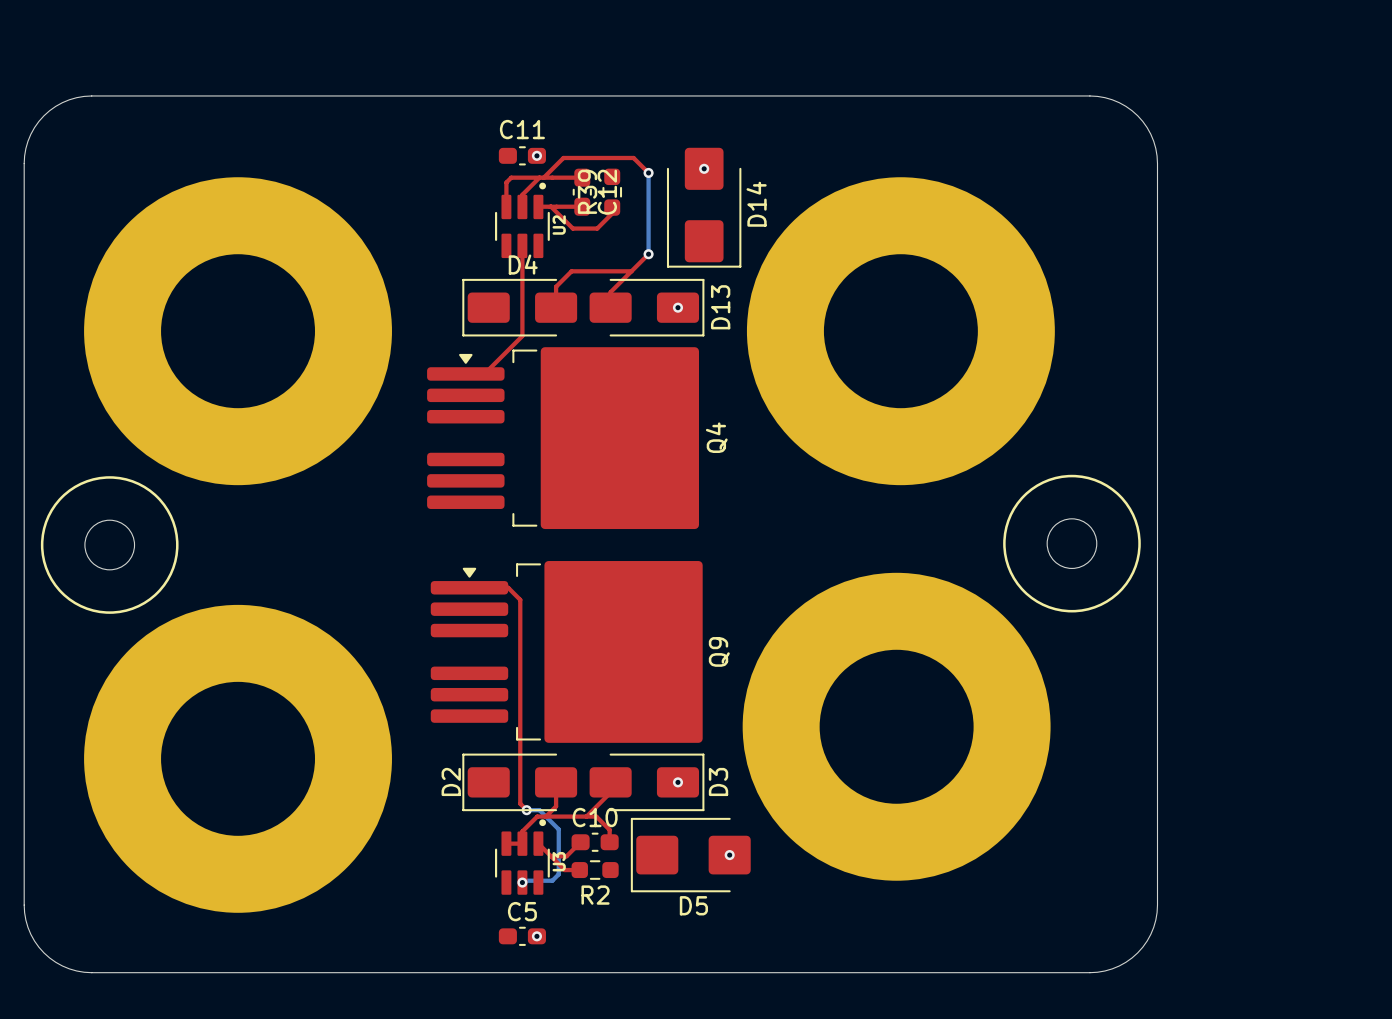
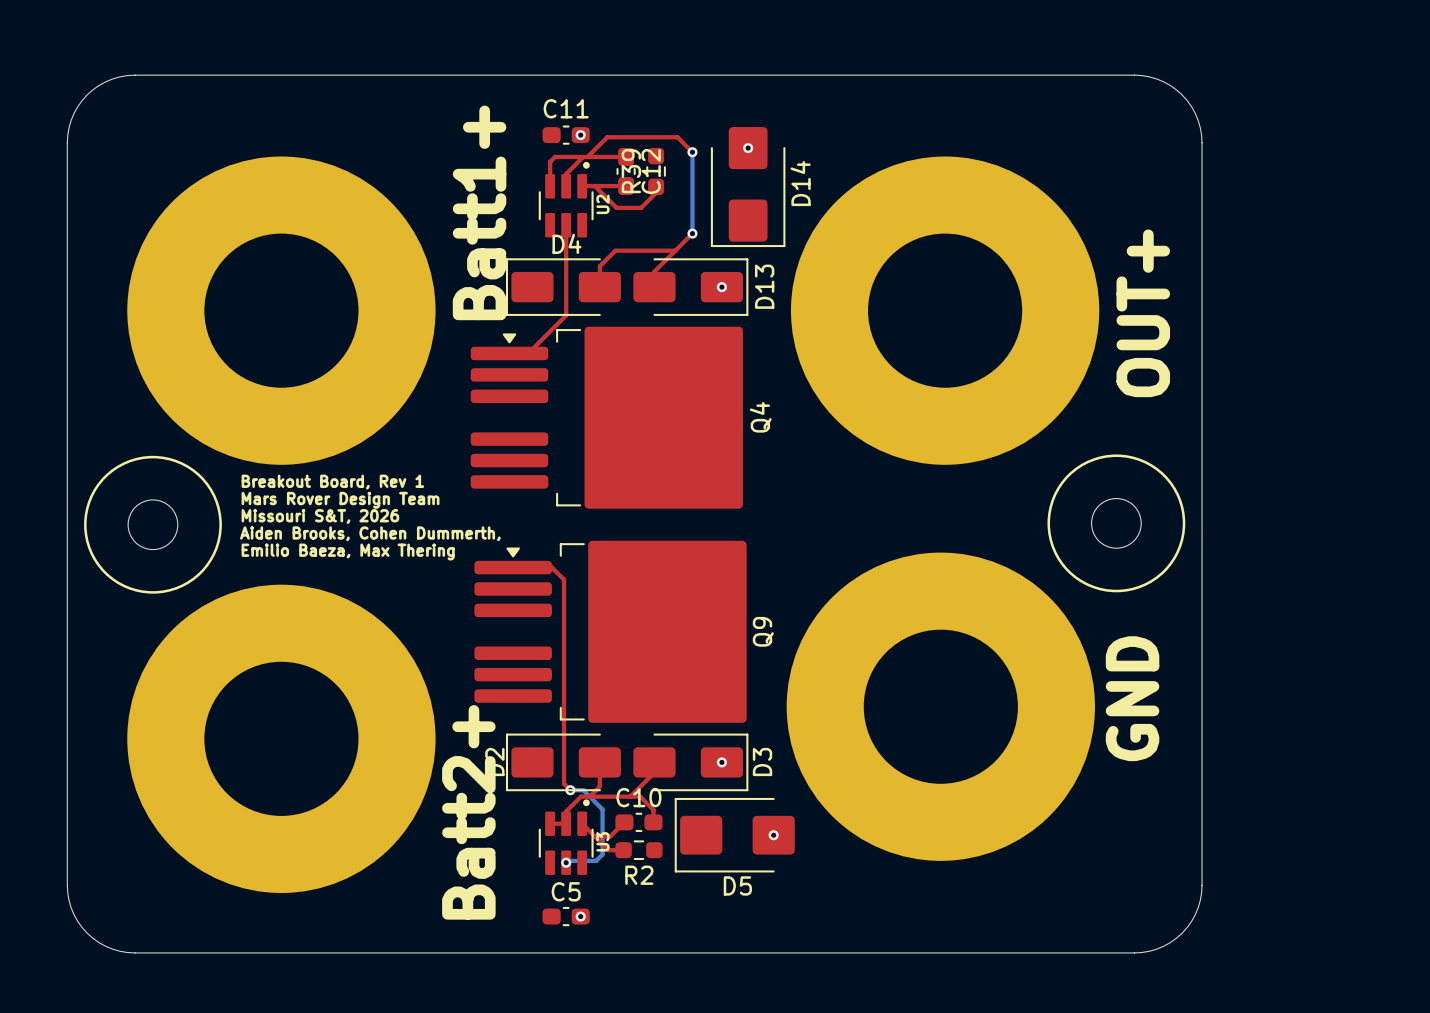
text: none -> Batt1+ (479, 212)
text: none -> OUT+ (1143, 313)
text: none -> Breakout Board, Rev 1 (332, 482)
text: none -> Mars Rover Design Team (340, 500)
text: none -> Missouri S&T, 2026 (320, 516)
text: none -> Aiden Brooks, Cohen Dummerth, (370, 533)
text: none -> Emilio Baeza, Max Thering (348, 552)
text: none -> GND (1132, 698)
text: none -> Batt2+ (468, 812)

